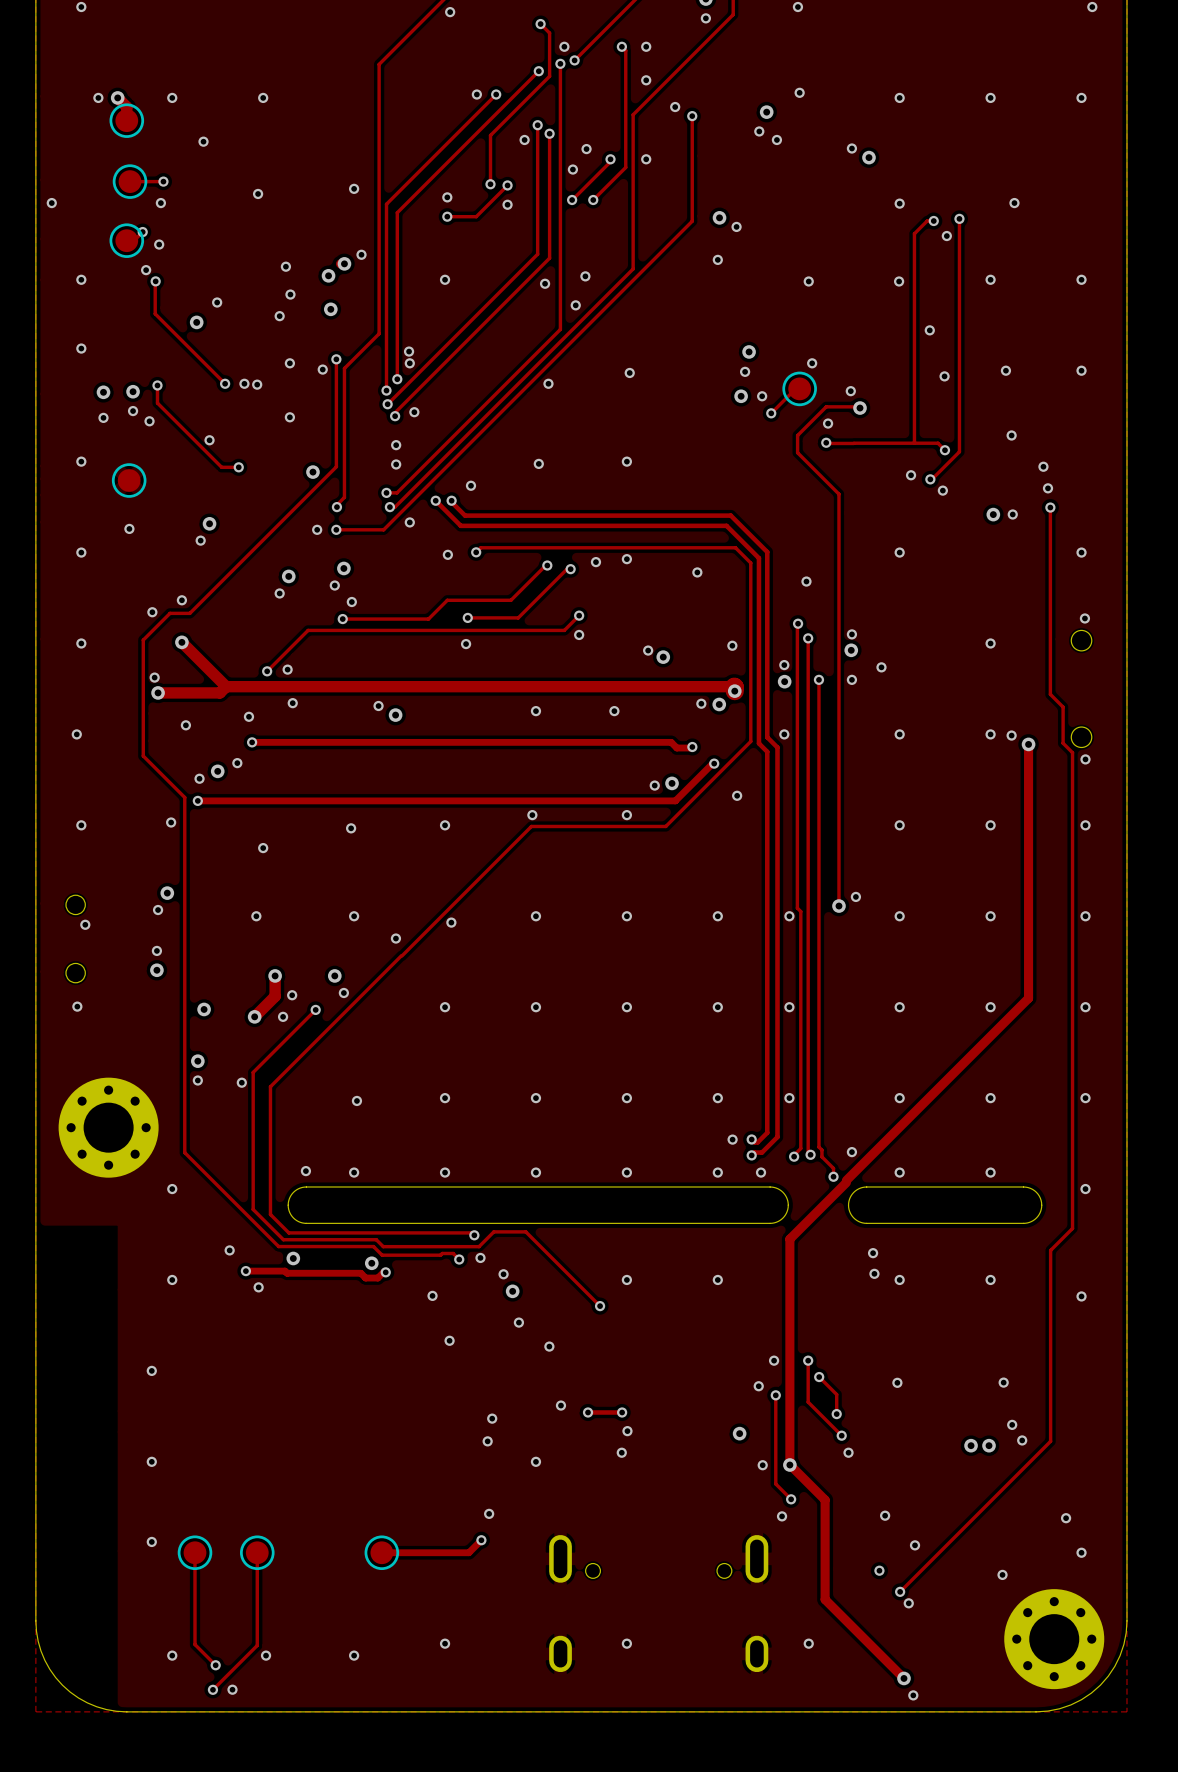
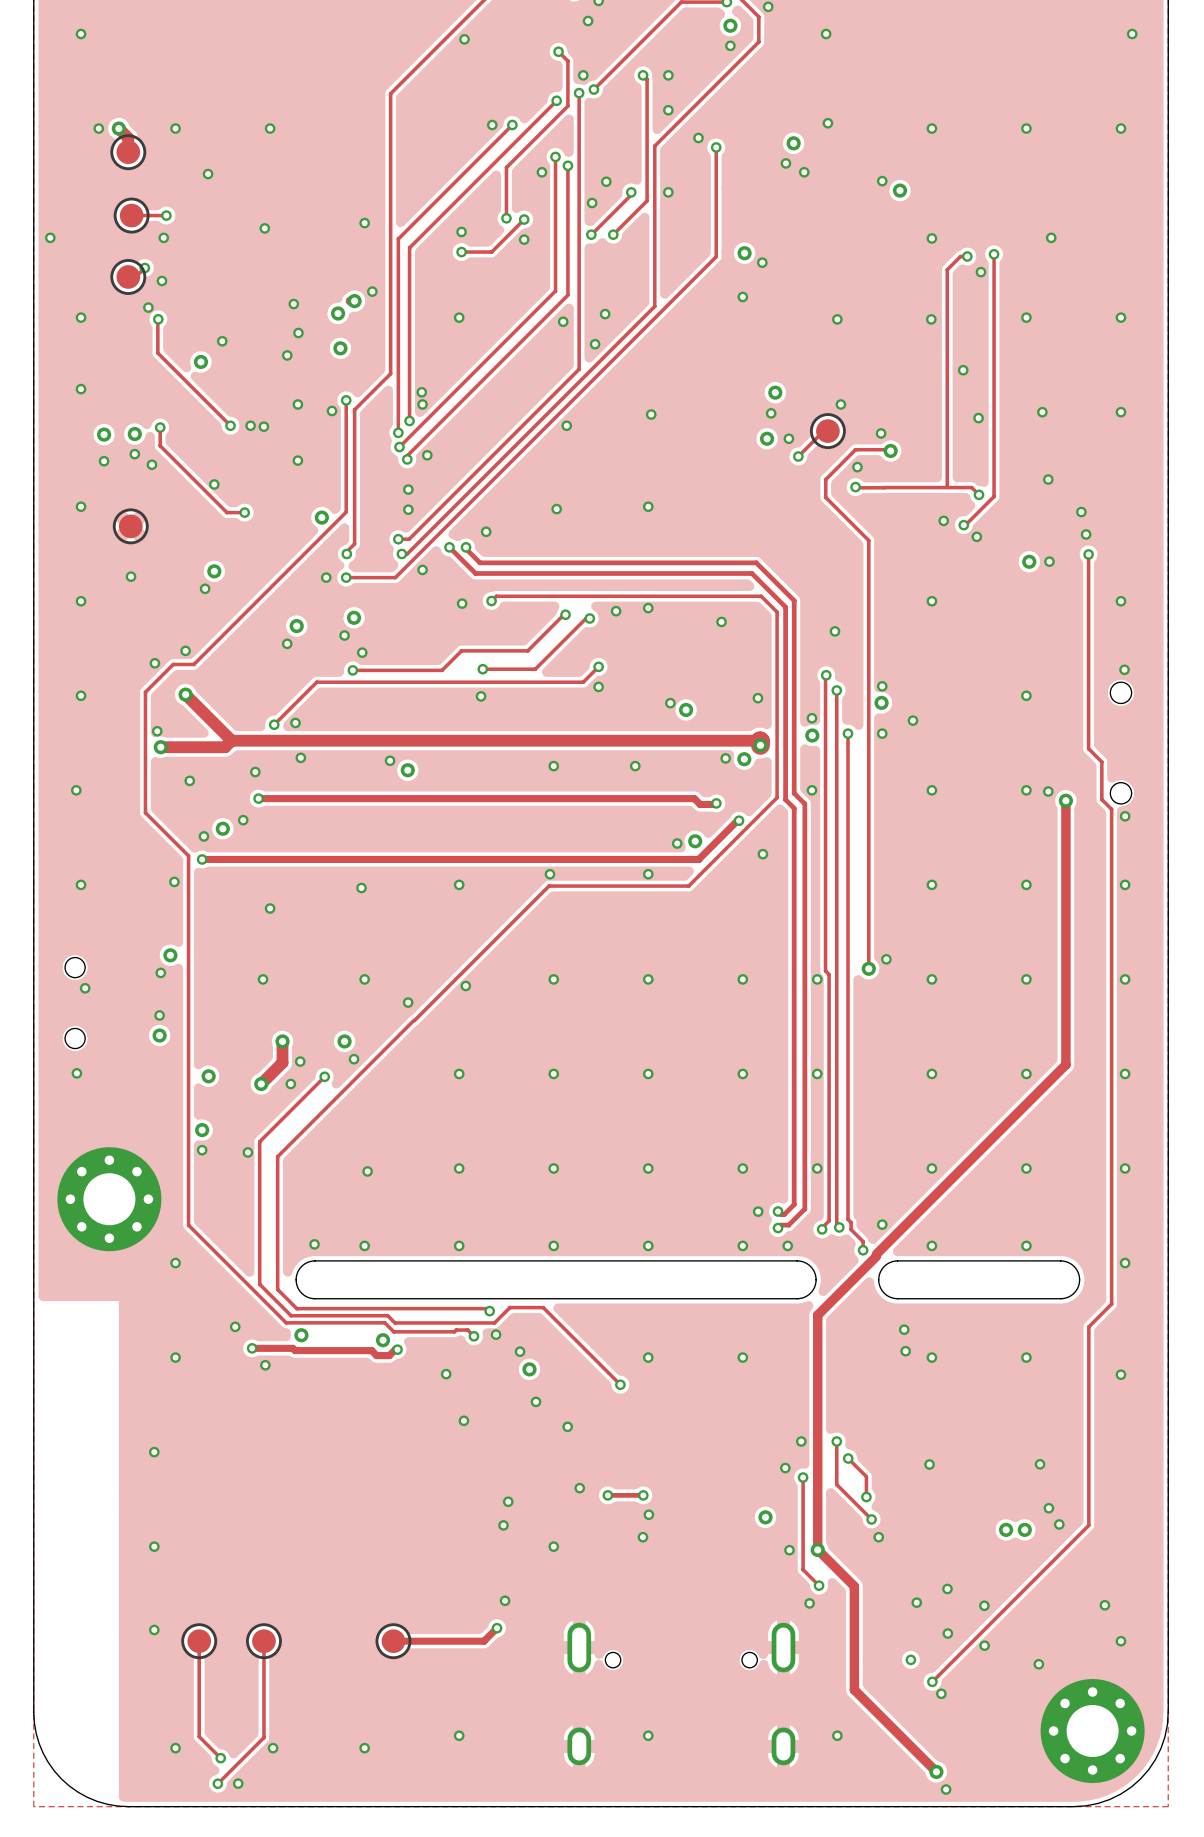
via: none -> (947, 1588)
via: none -> (984, 1605)
via: none -> (984, 1645)

